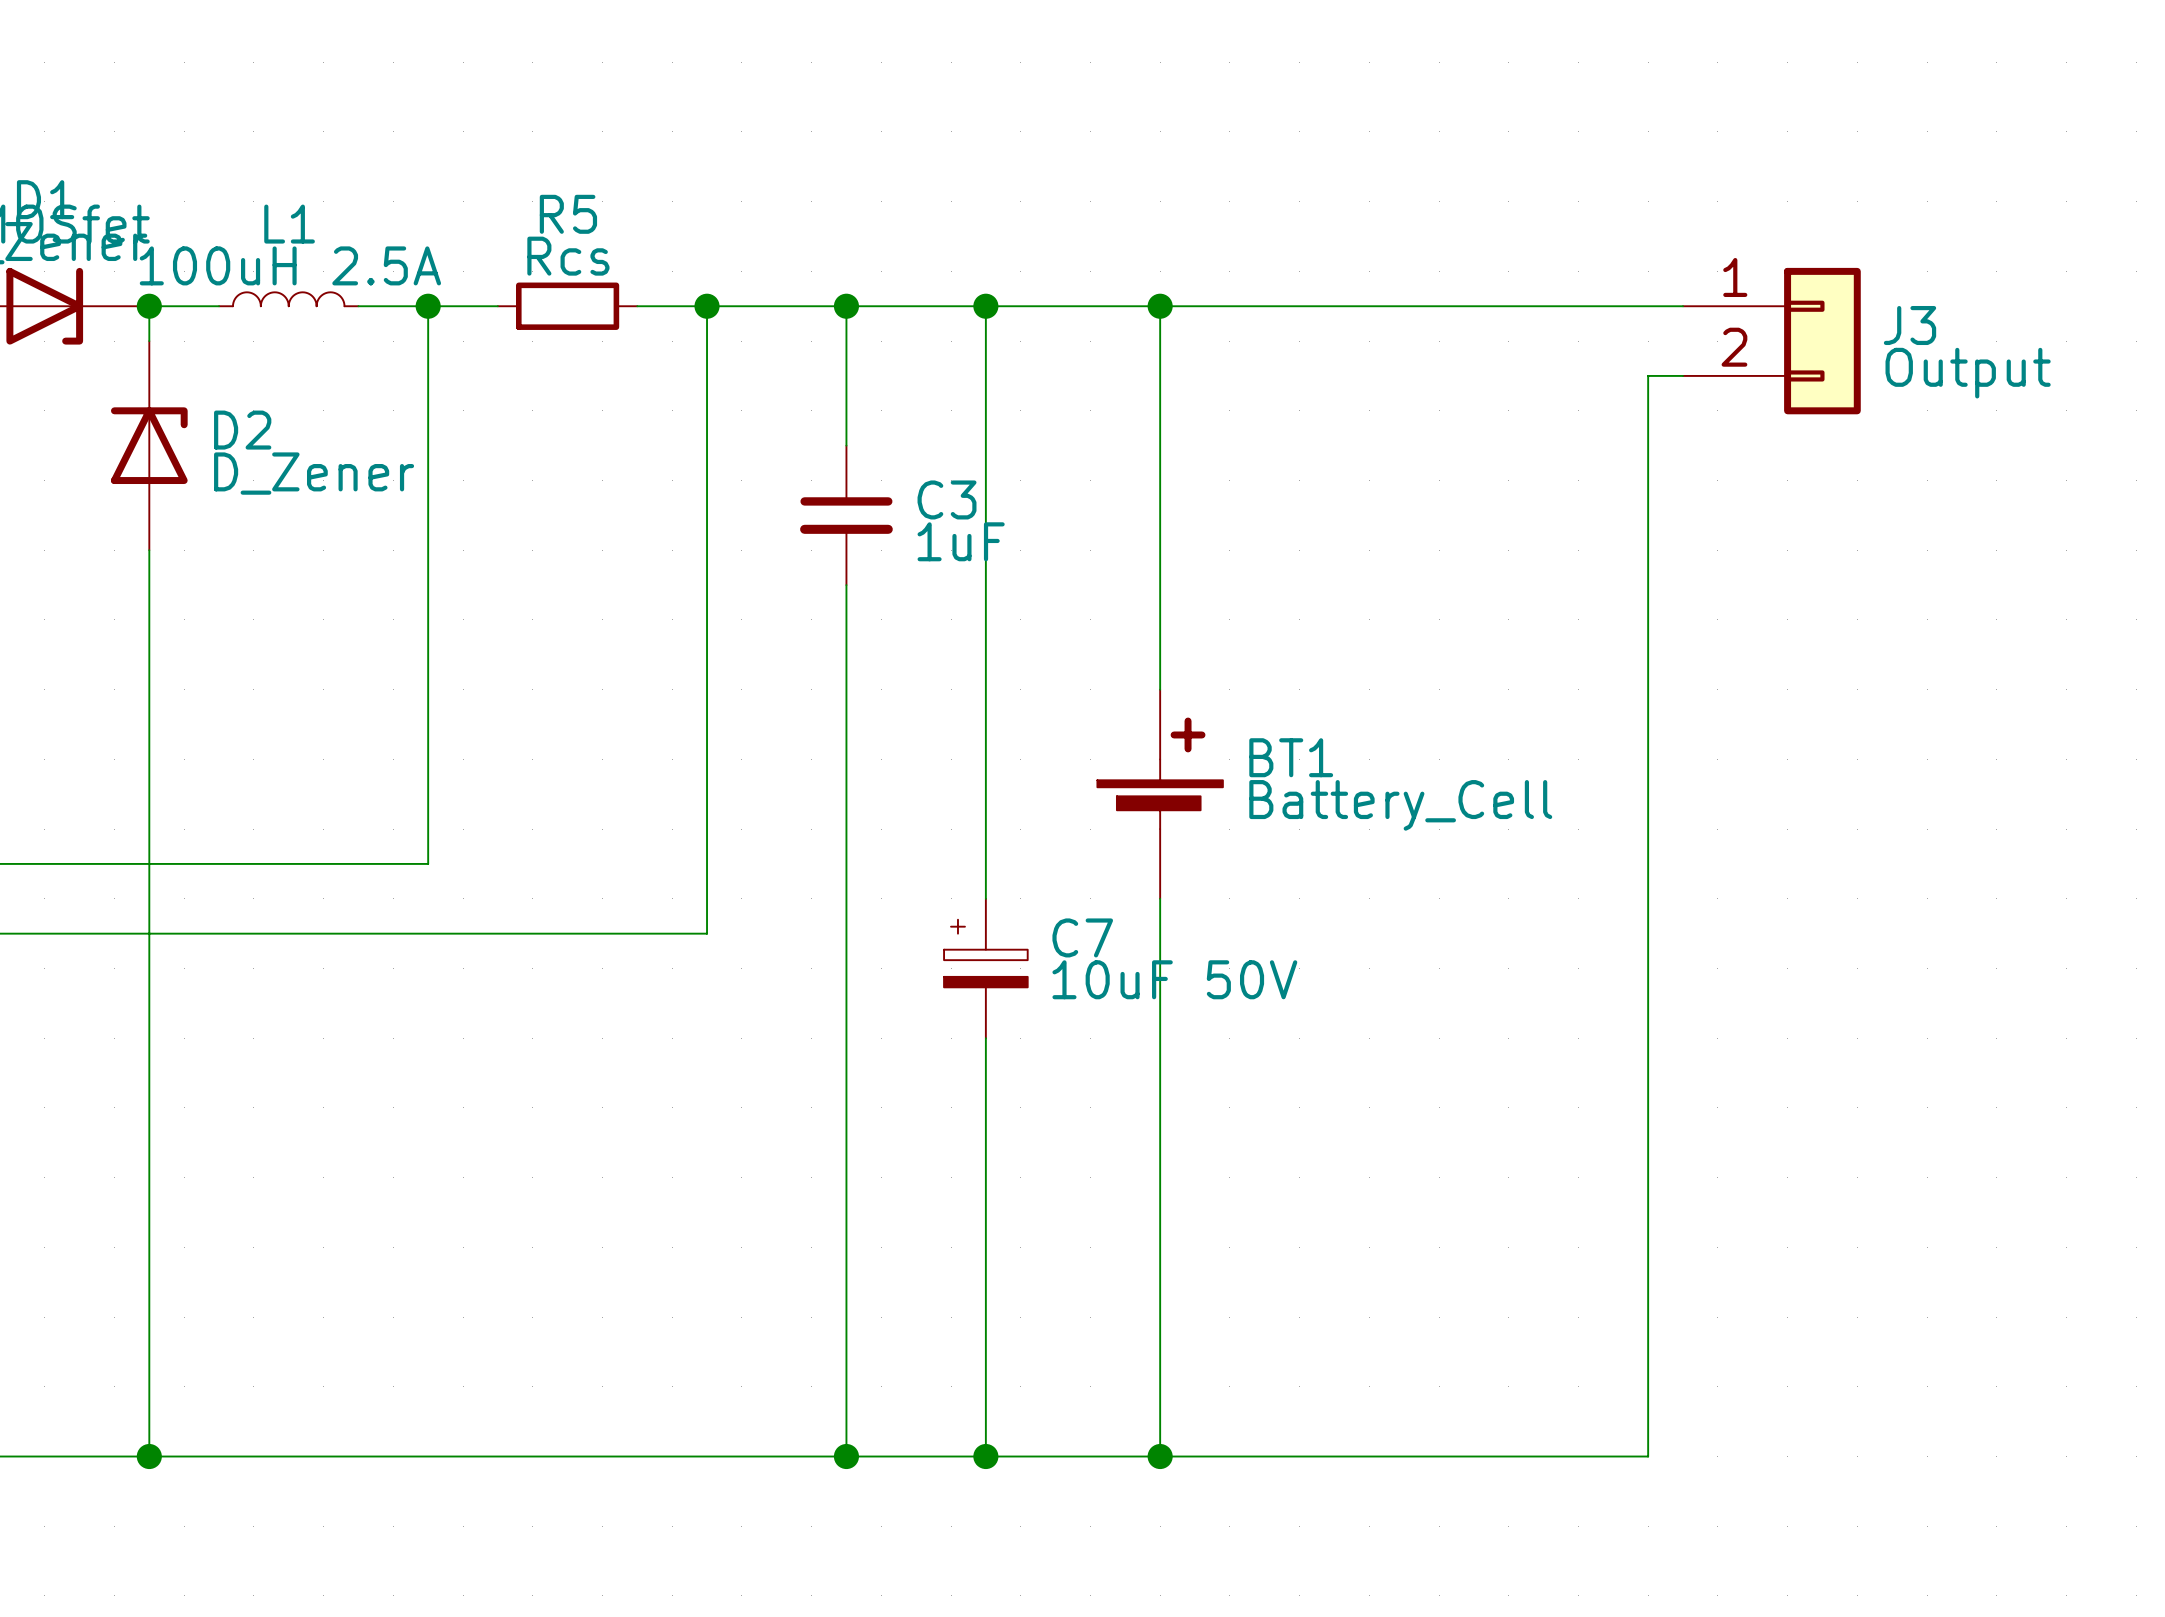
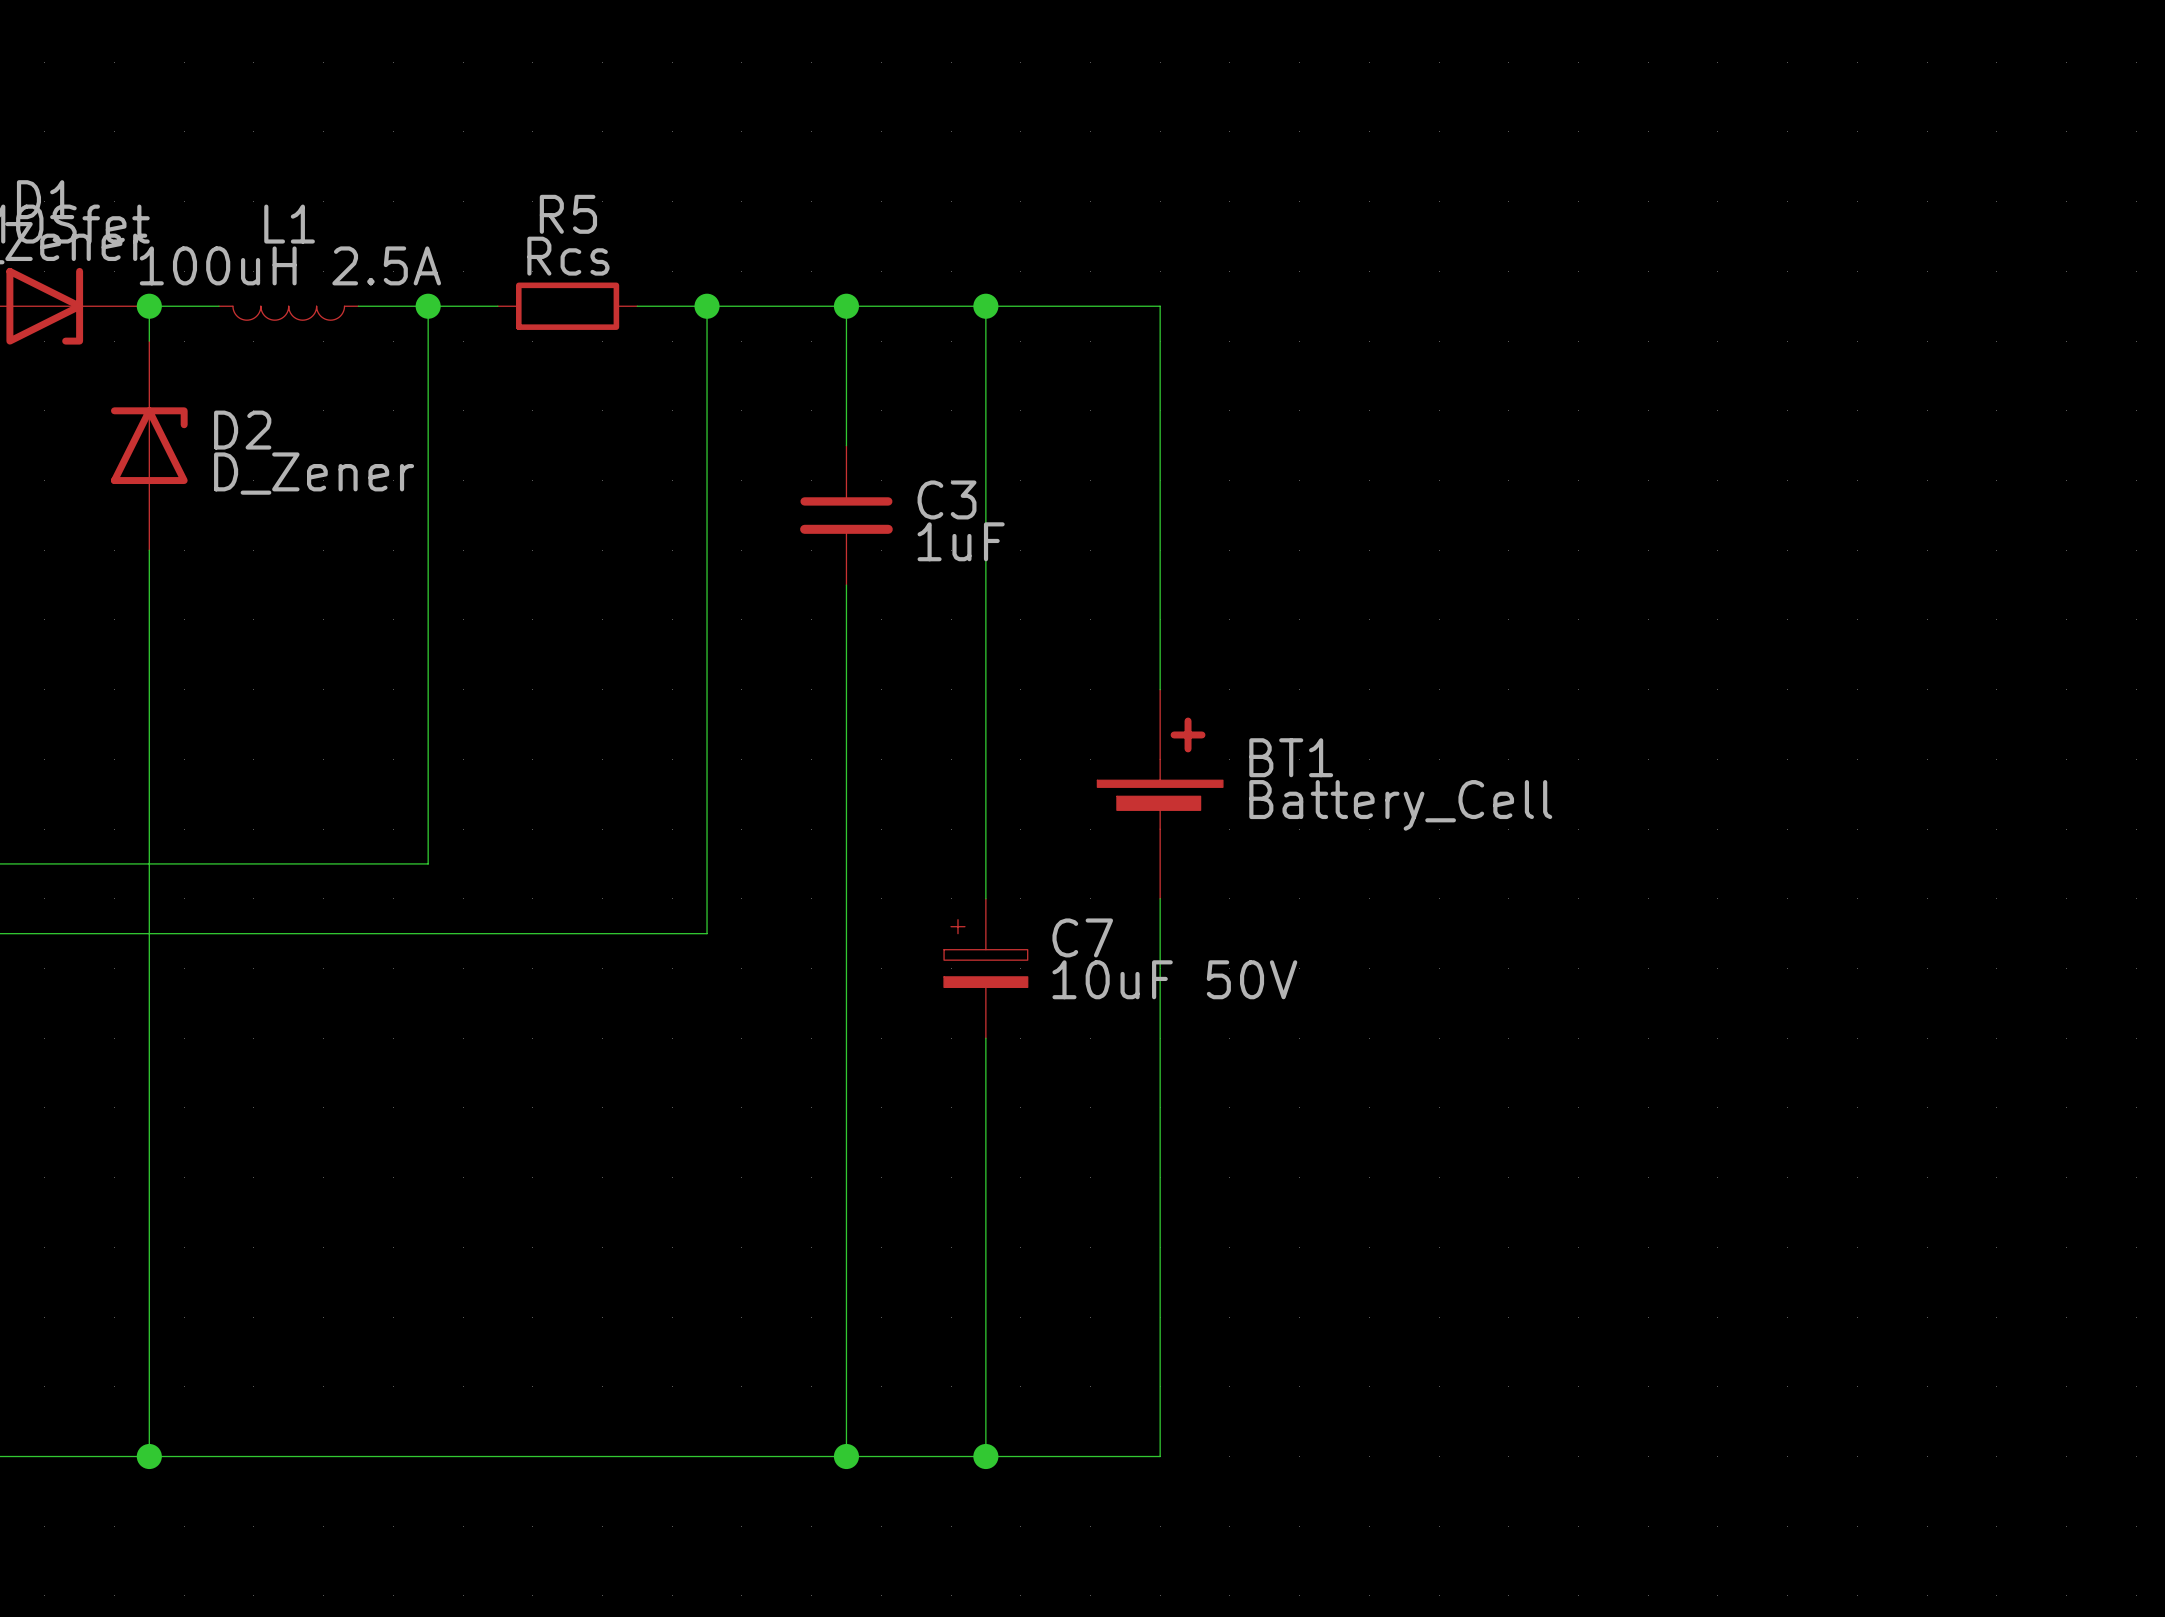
L1 rotation: 0° (288, 299) -> 180° (288, 313)
wire: (1160, 306) (1683, 306) -> none
junction: (1160, 306) -> none
J3: Output (1771, 341) -> none
wire: (1683, 375) (1648, 375) (1648, 1456) (1160, 1456) -> none
junction: (1160, 1456) -> none

